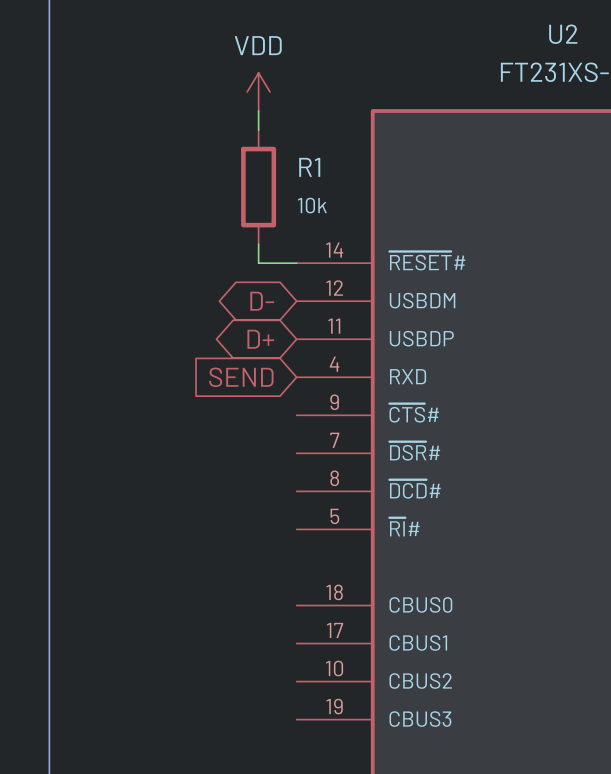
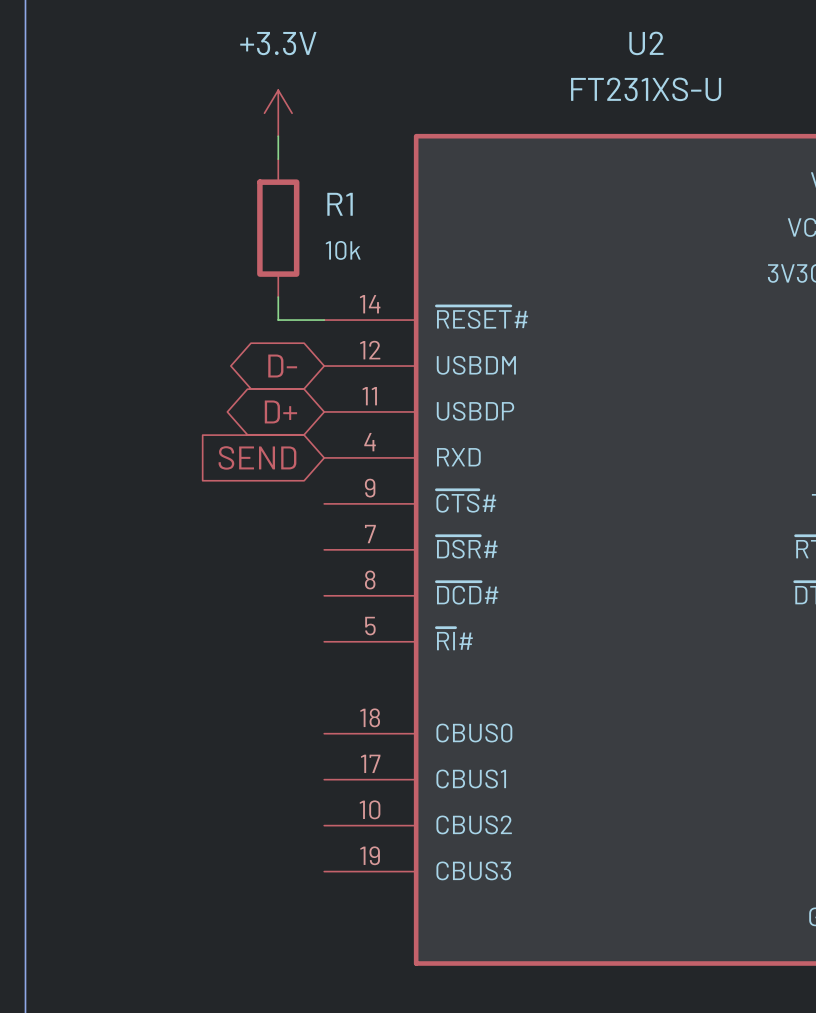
power symbol: VDD (258, 91) -> +3.3V (278, 113)

